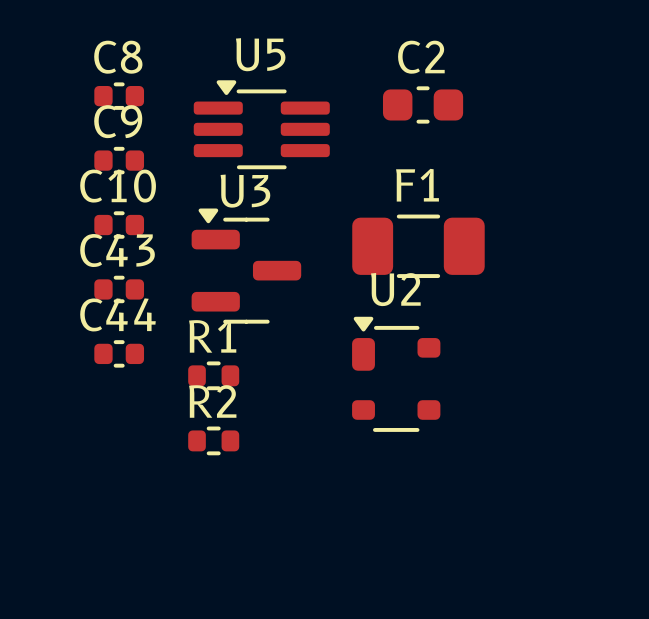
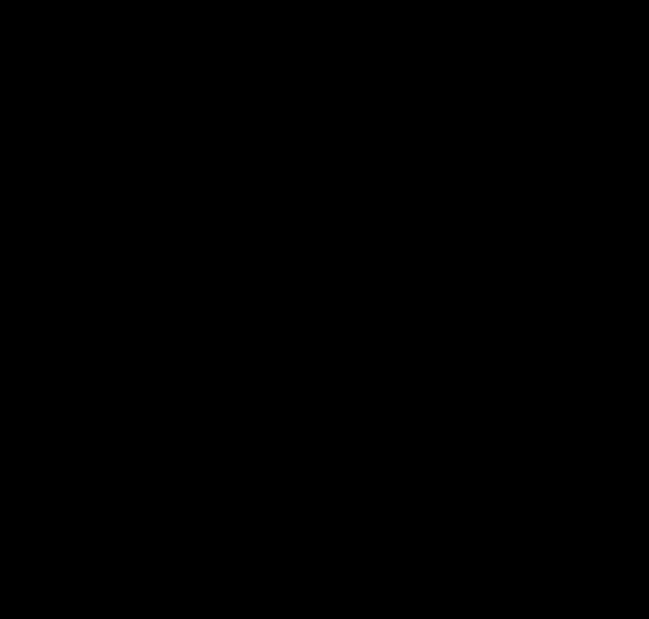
C8: (119, 96) -> none
C2: (423, 104) -> none
U5: (261, 124) -> none
C9: (119, 160) -> none
C10: (119, 225) -> none
F1: (418, 246) -> none
U3: (246, 266) -> none
C43: (119, 289) -> none
C44: (119, 353) -> none
U2: (396, 374) -> none
R1: (213, 375) -> none
R2: (213, 440) -> none

